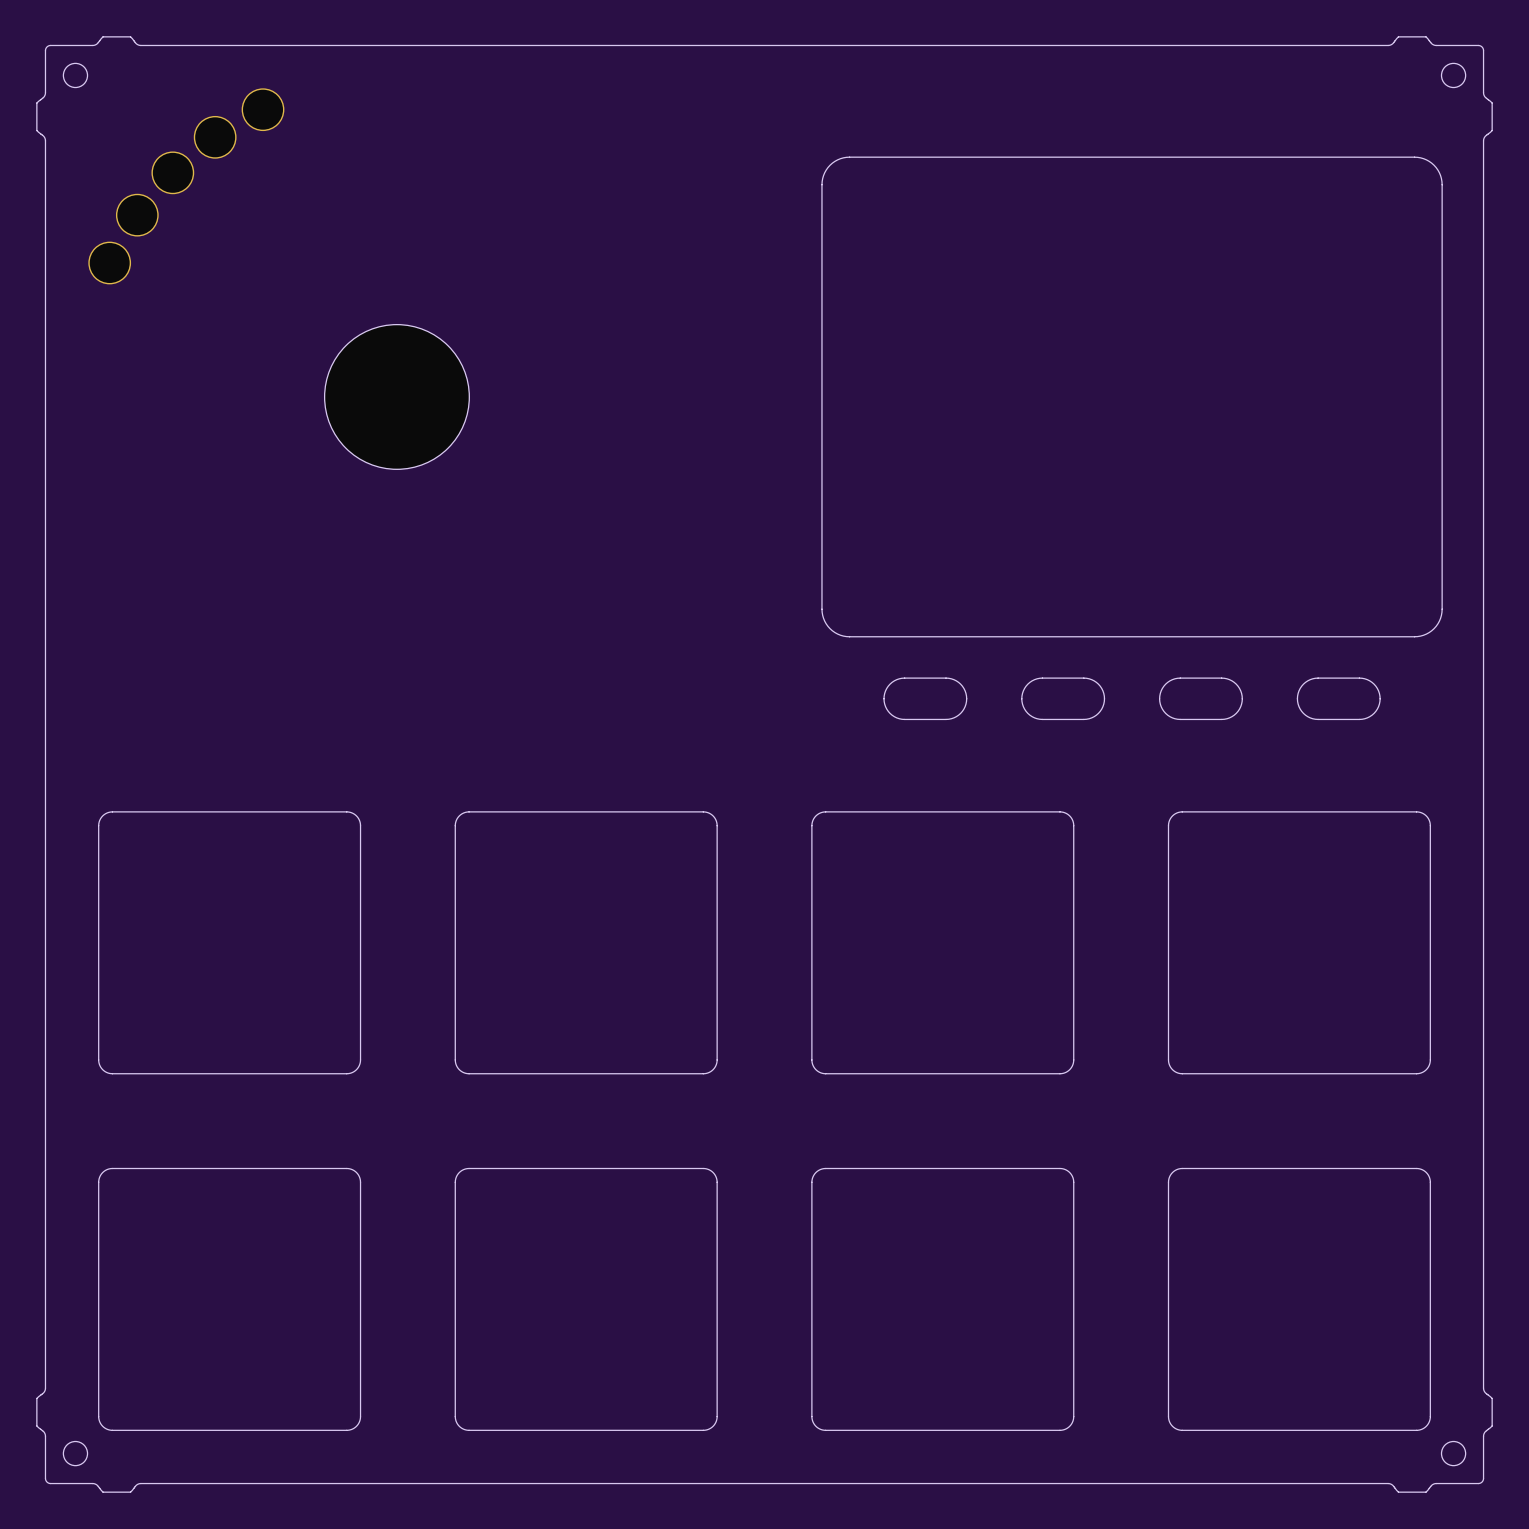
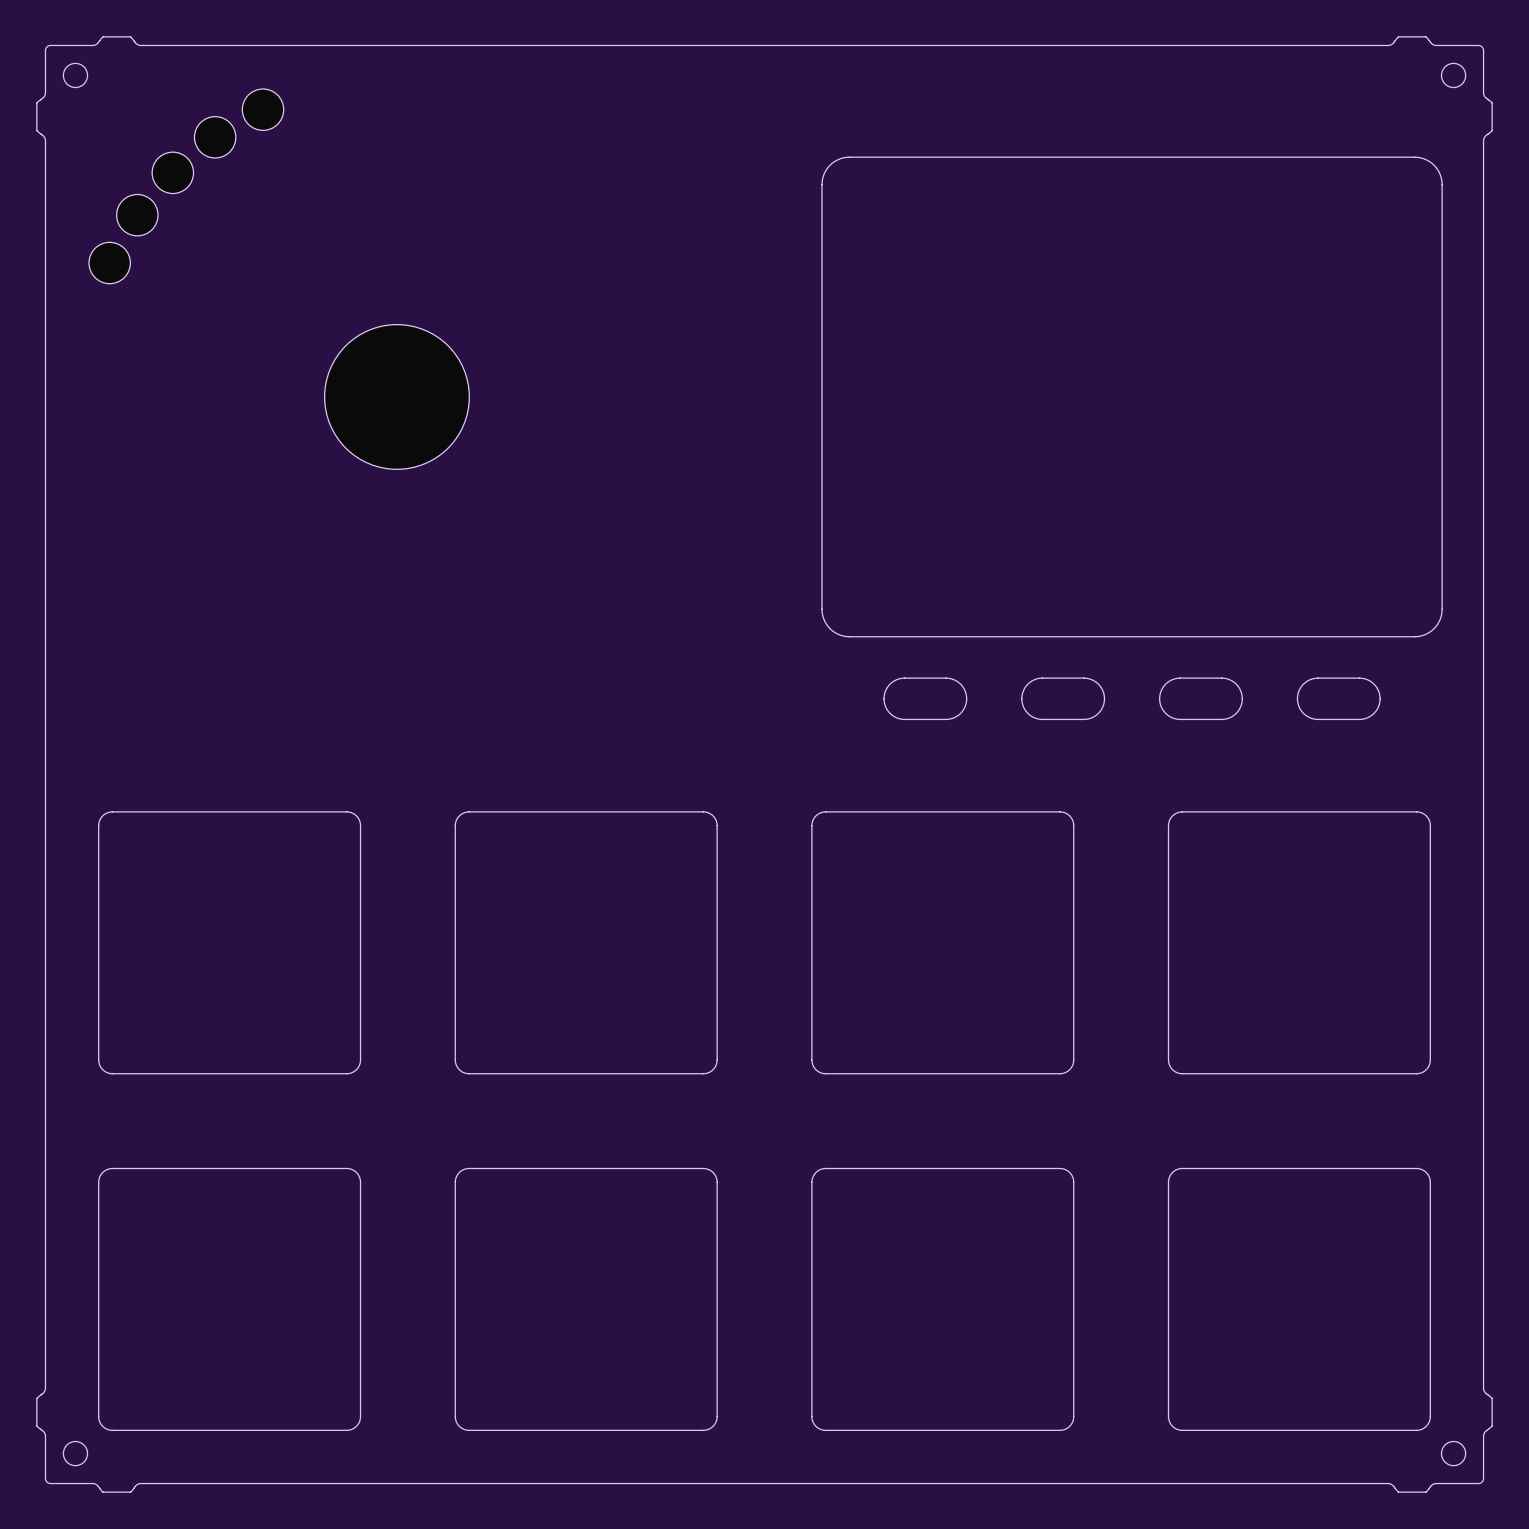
part footprint: [241, 88, 285, 132] -> [242, 89, 284, 131]
part footprint: [193, 115, 237, 159] -> [194, 116, 236, 158]
part footprint: [151, 151, 195, 195] -> [152, 152, 194, 194]
part footprint: [115, 193, 159, 237] -> [116, 194, 158, 236]
part footprint: [88, 241, 132, 285] -> [89, 242, 131, 284]

